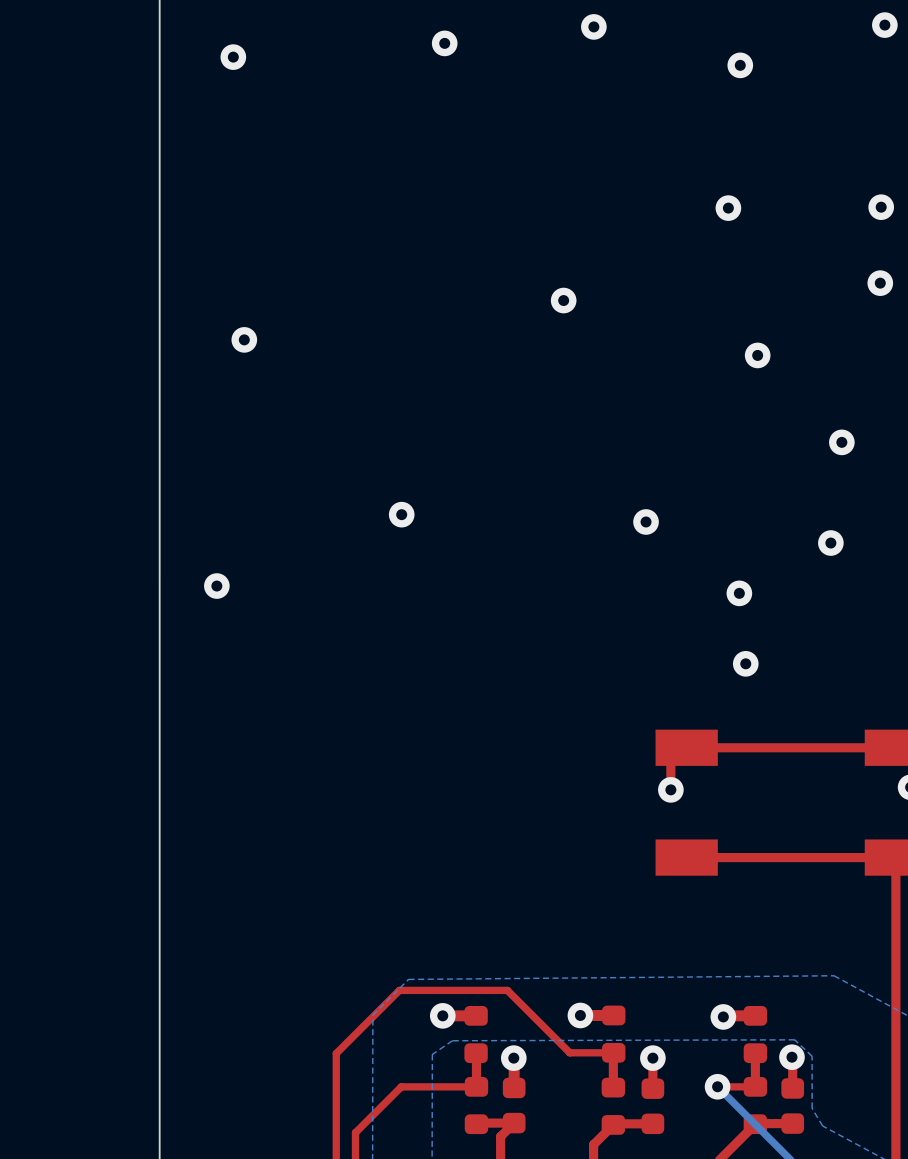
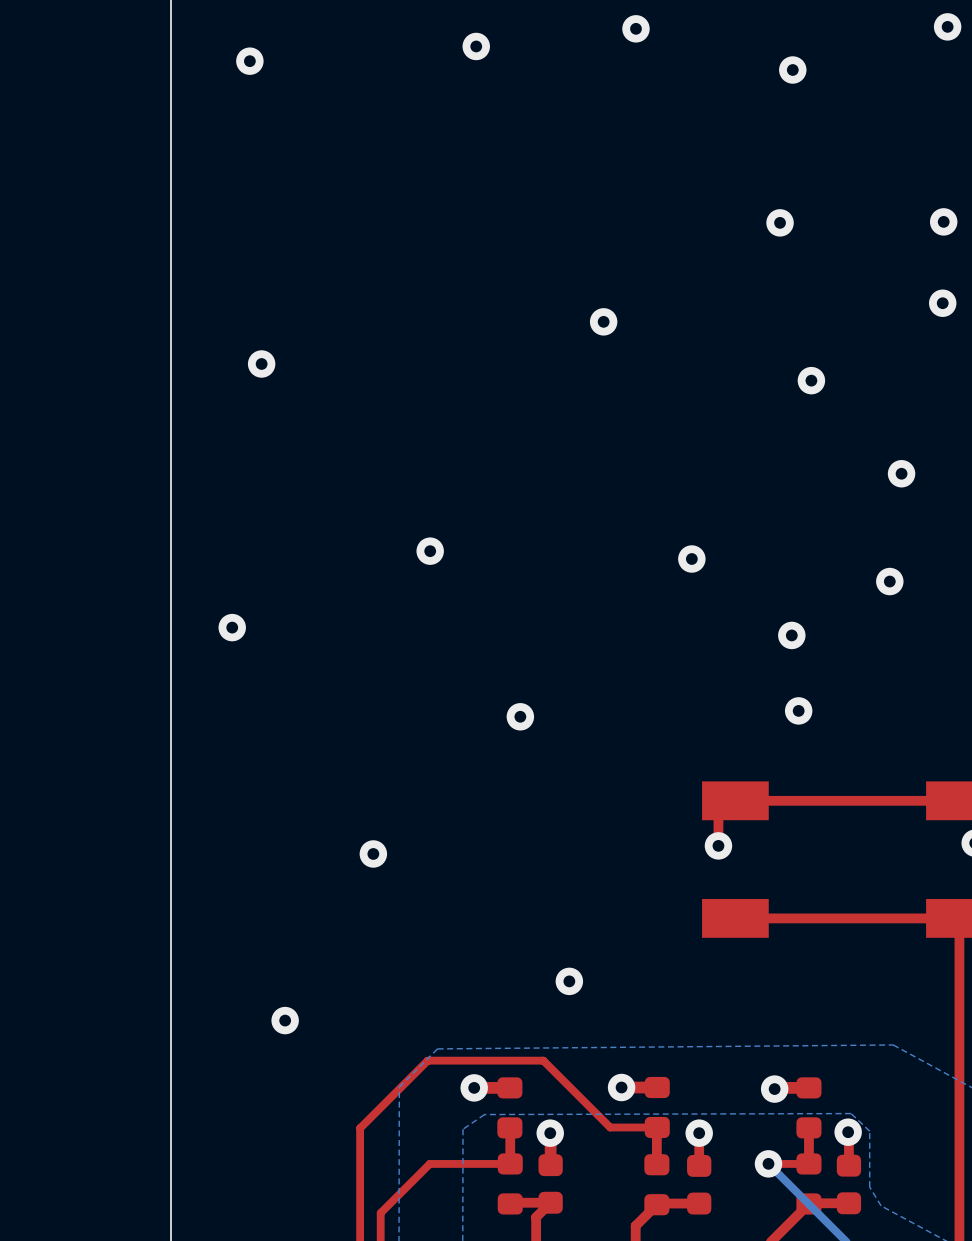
via: none -> (520, 716)
via: none -> (373, 853)
via: none -> (569, 981)
via: none -> (285, 1020)

